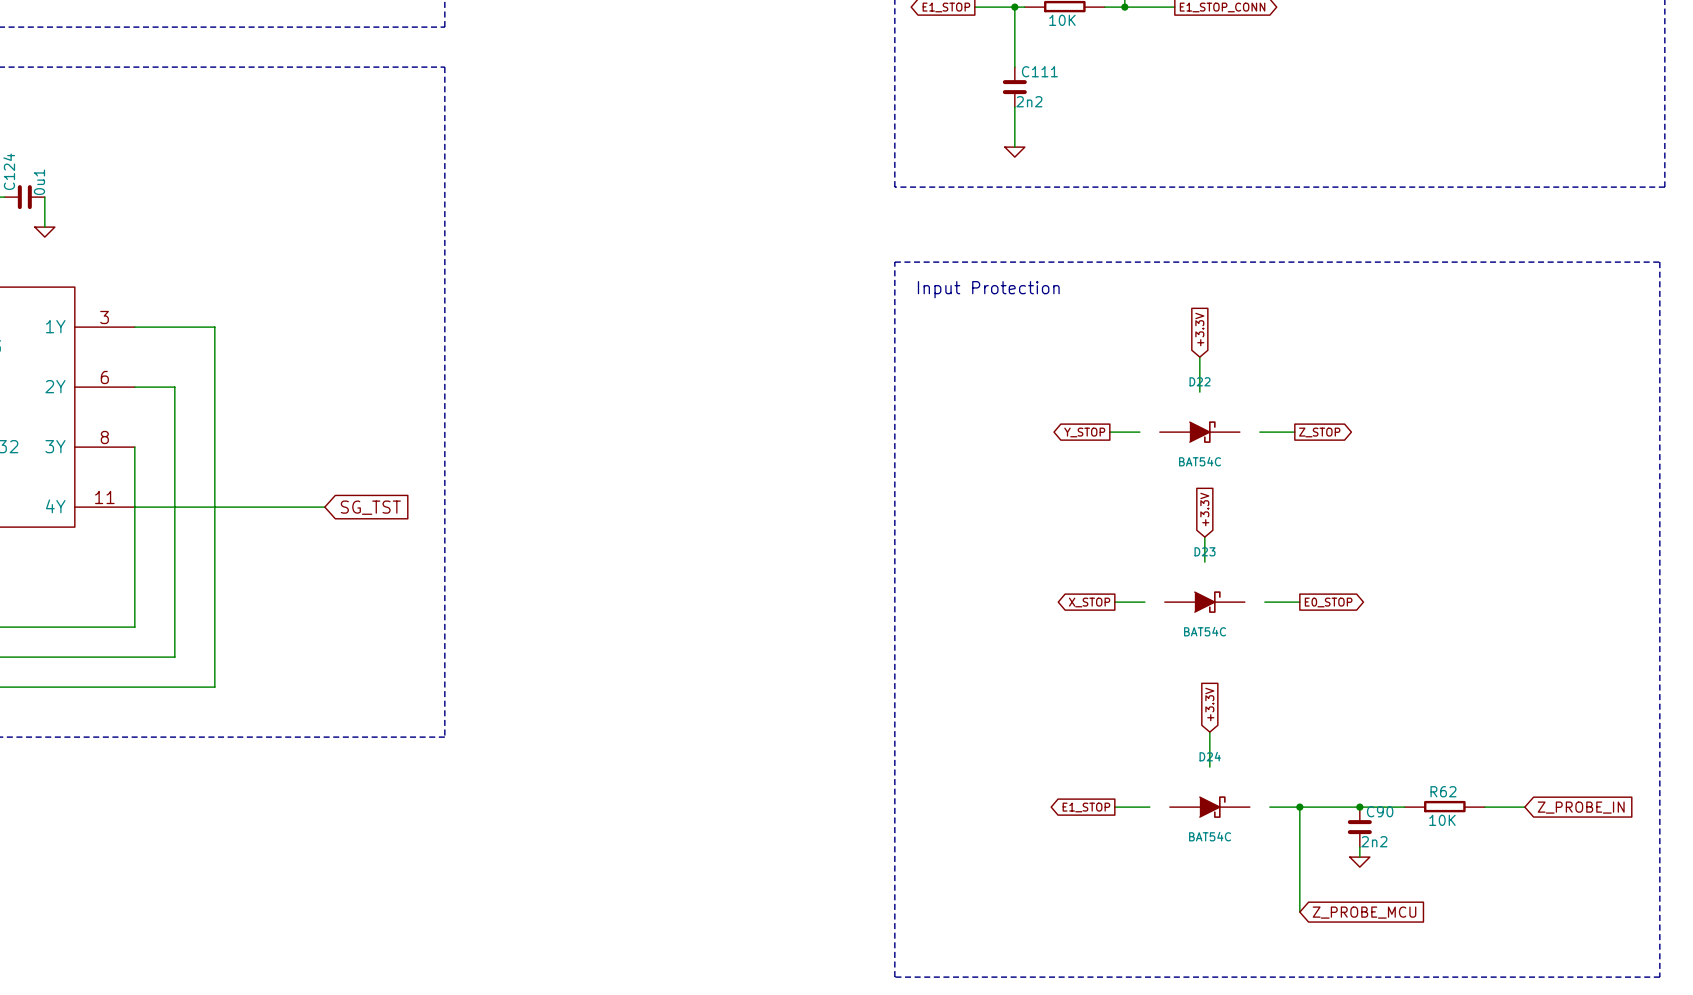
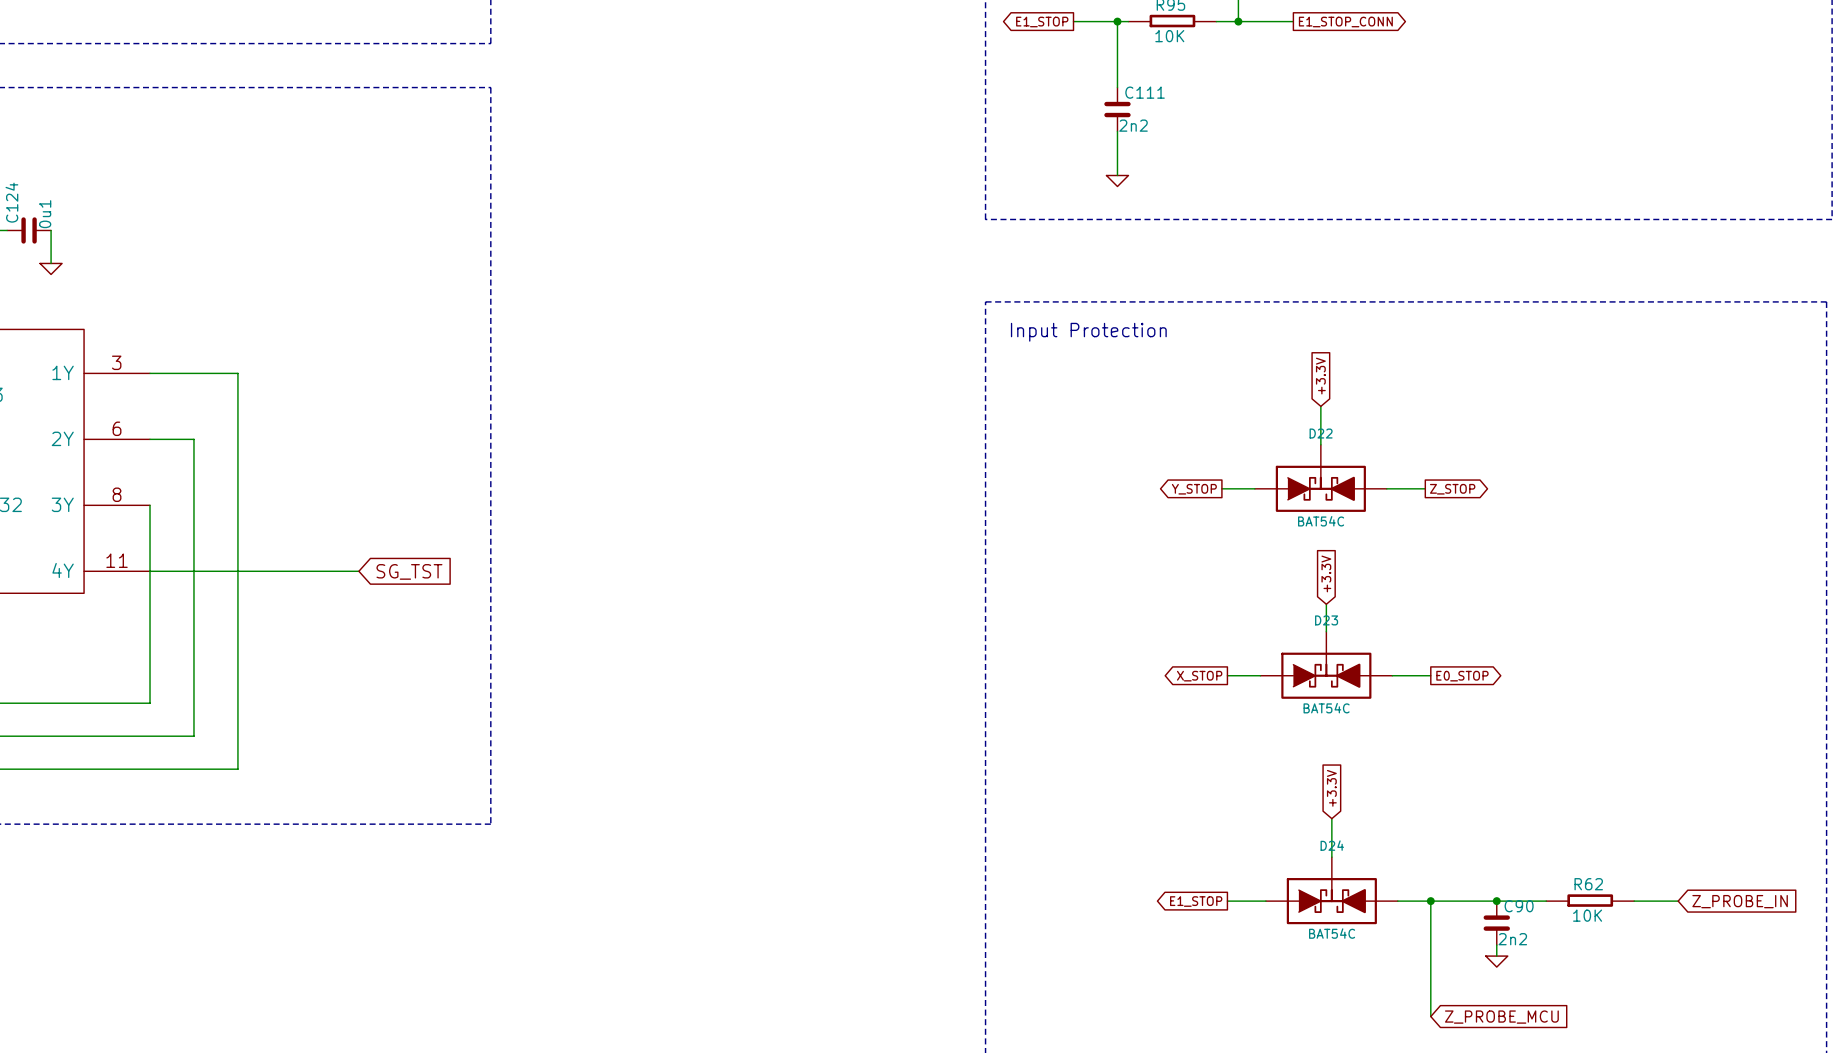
D22 symbol: [1159, 421, 1240, 443] -> [1254, 444, 1387, 512]
D23 symbol: [1164, 591, 1245, 613] -> [1260, 631, 1393, 699]
D24 symbol: [1169, 796, 1250, 818] -> [1265, 857, 1398, 925]

